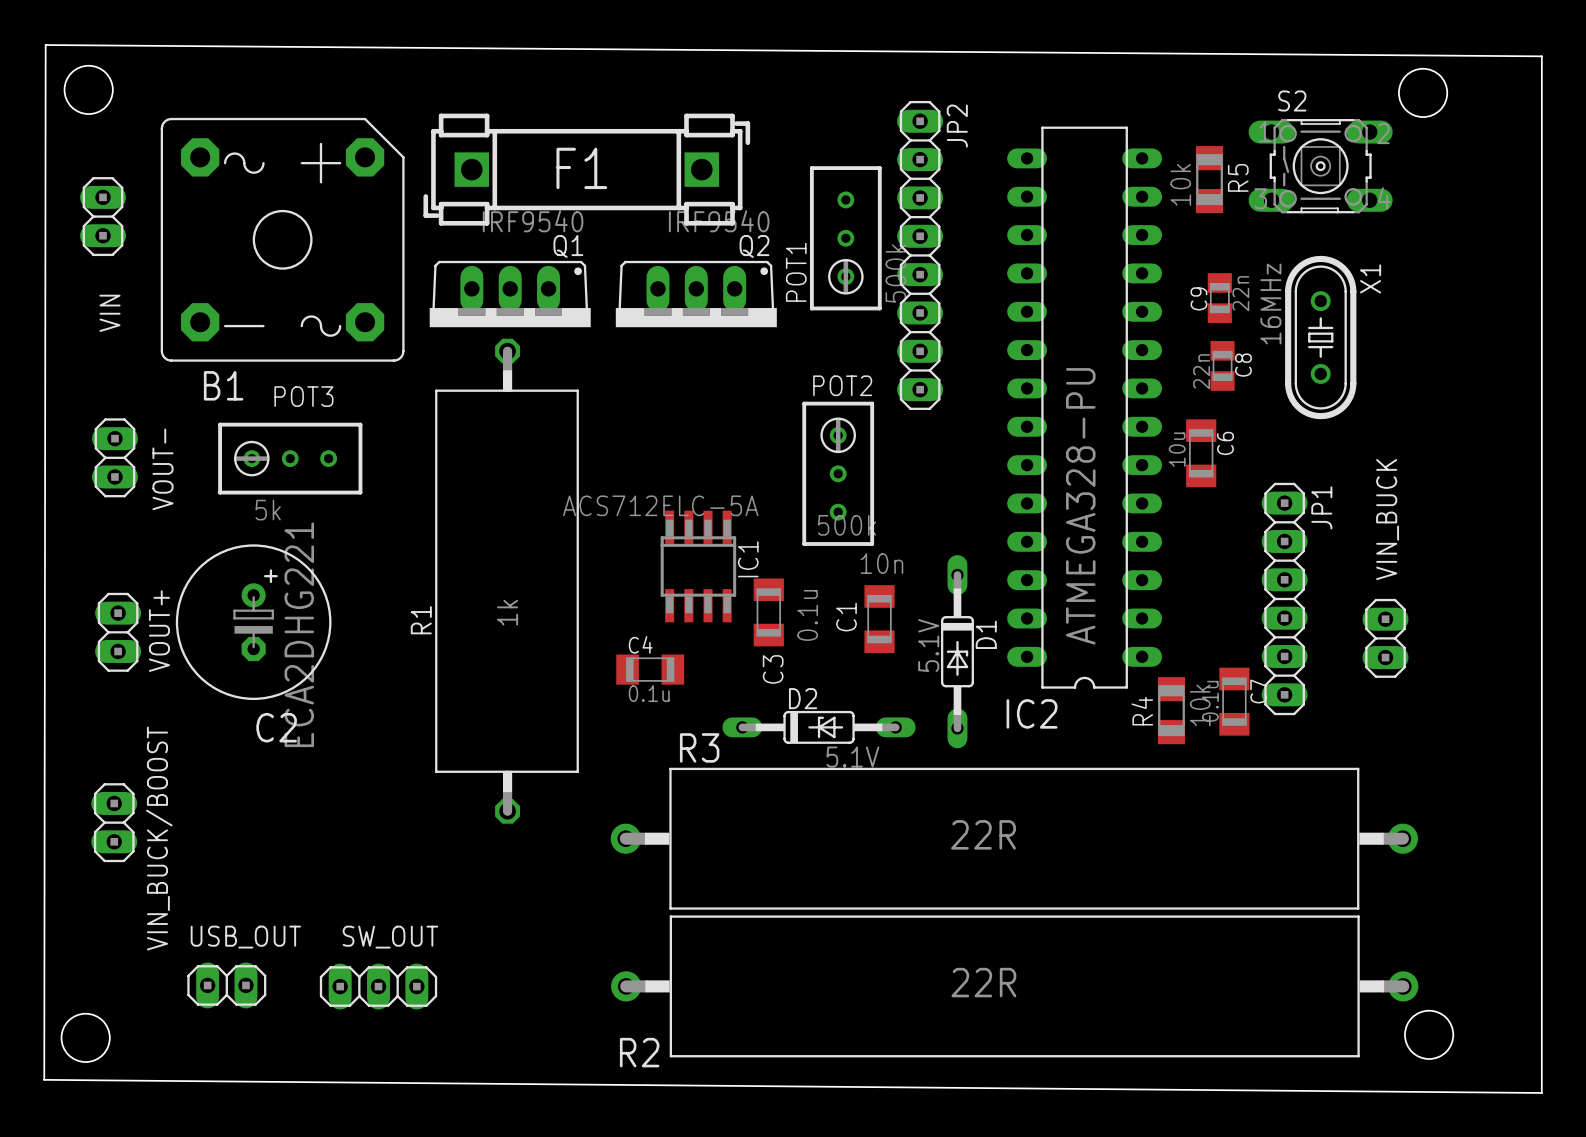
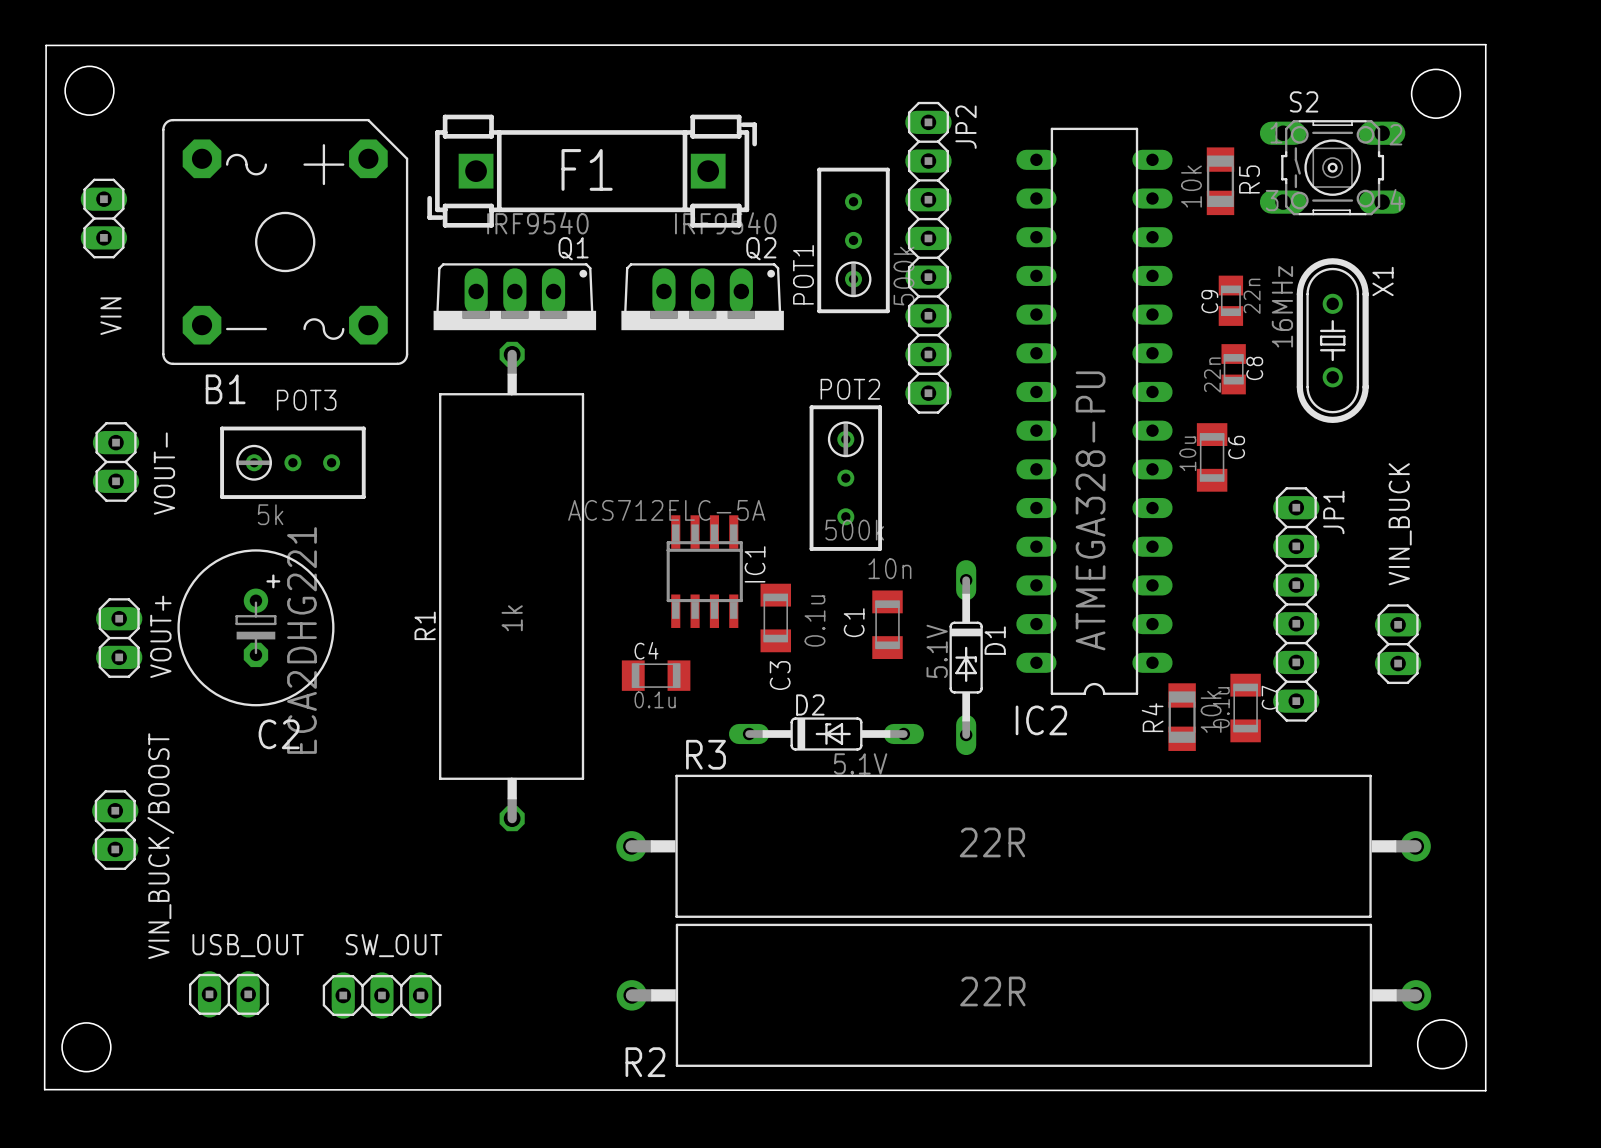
board edge: (45, 45) (1541, 56) (1541, 1092) (44, 1079) -> (46, 45) (1485, 44) (1485, 1090) (44, 1089)

